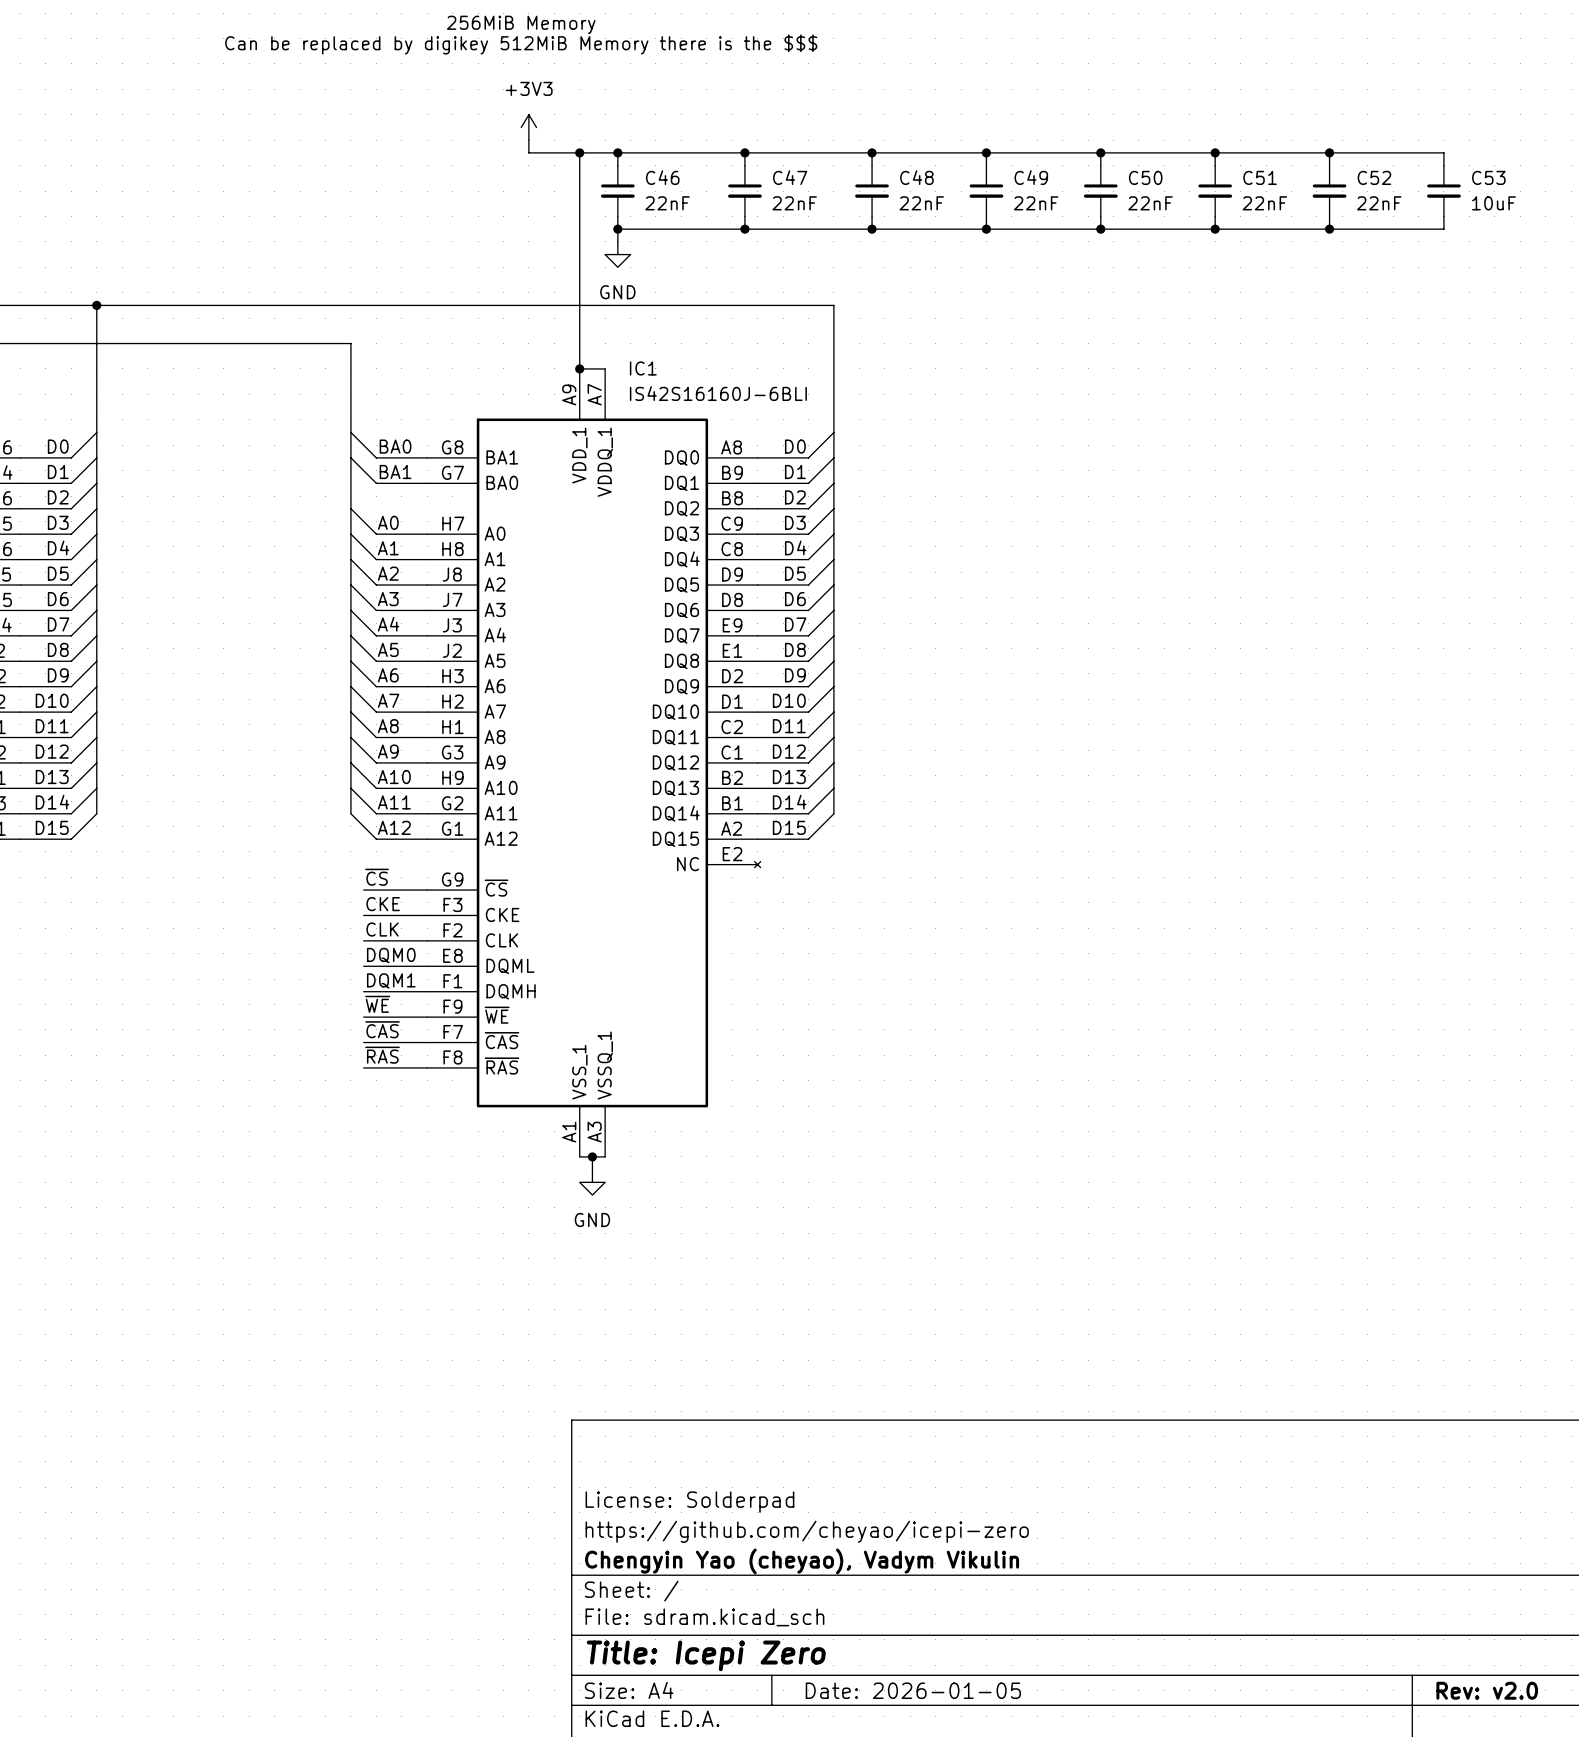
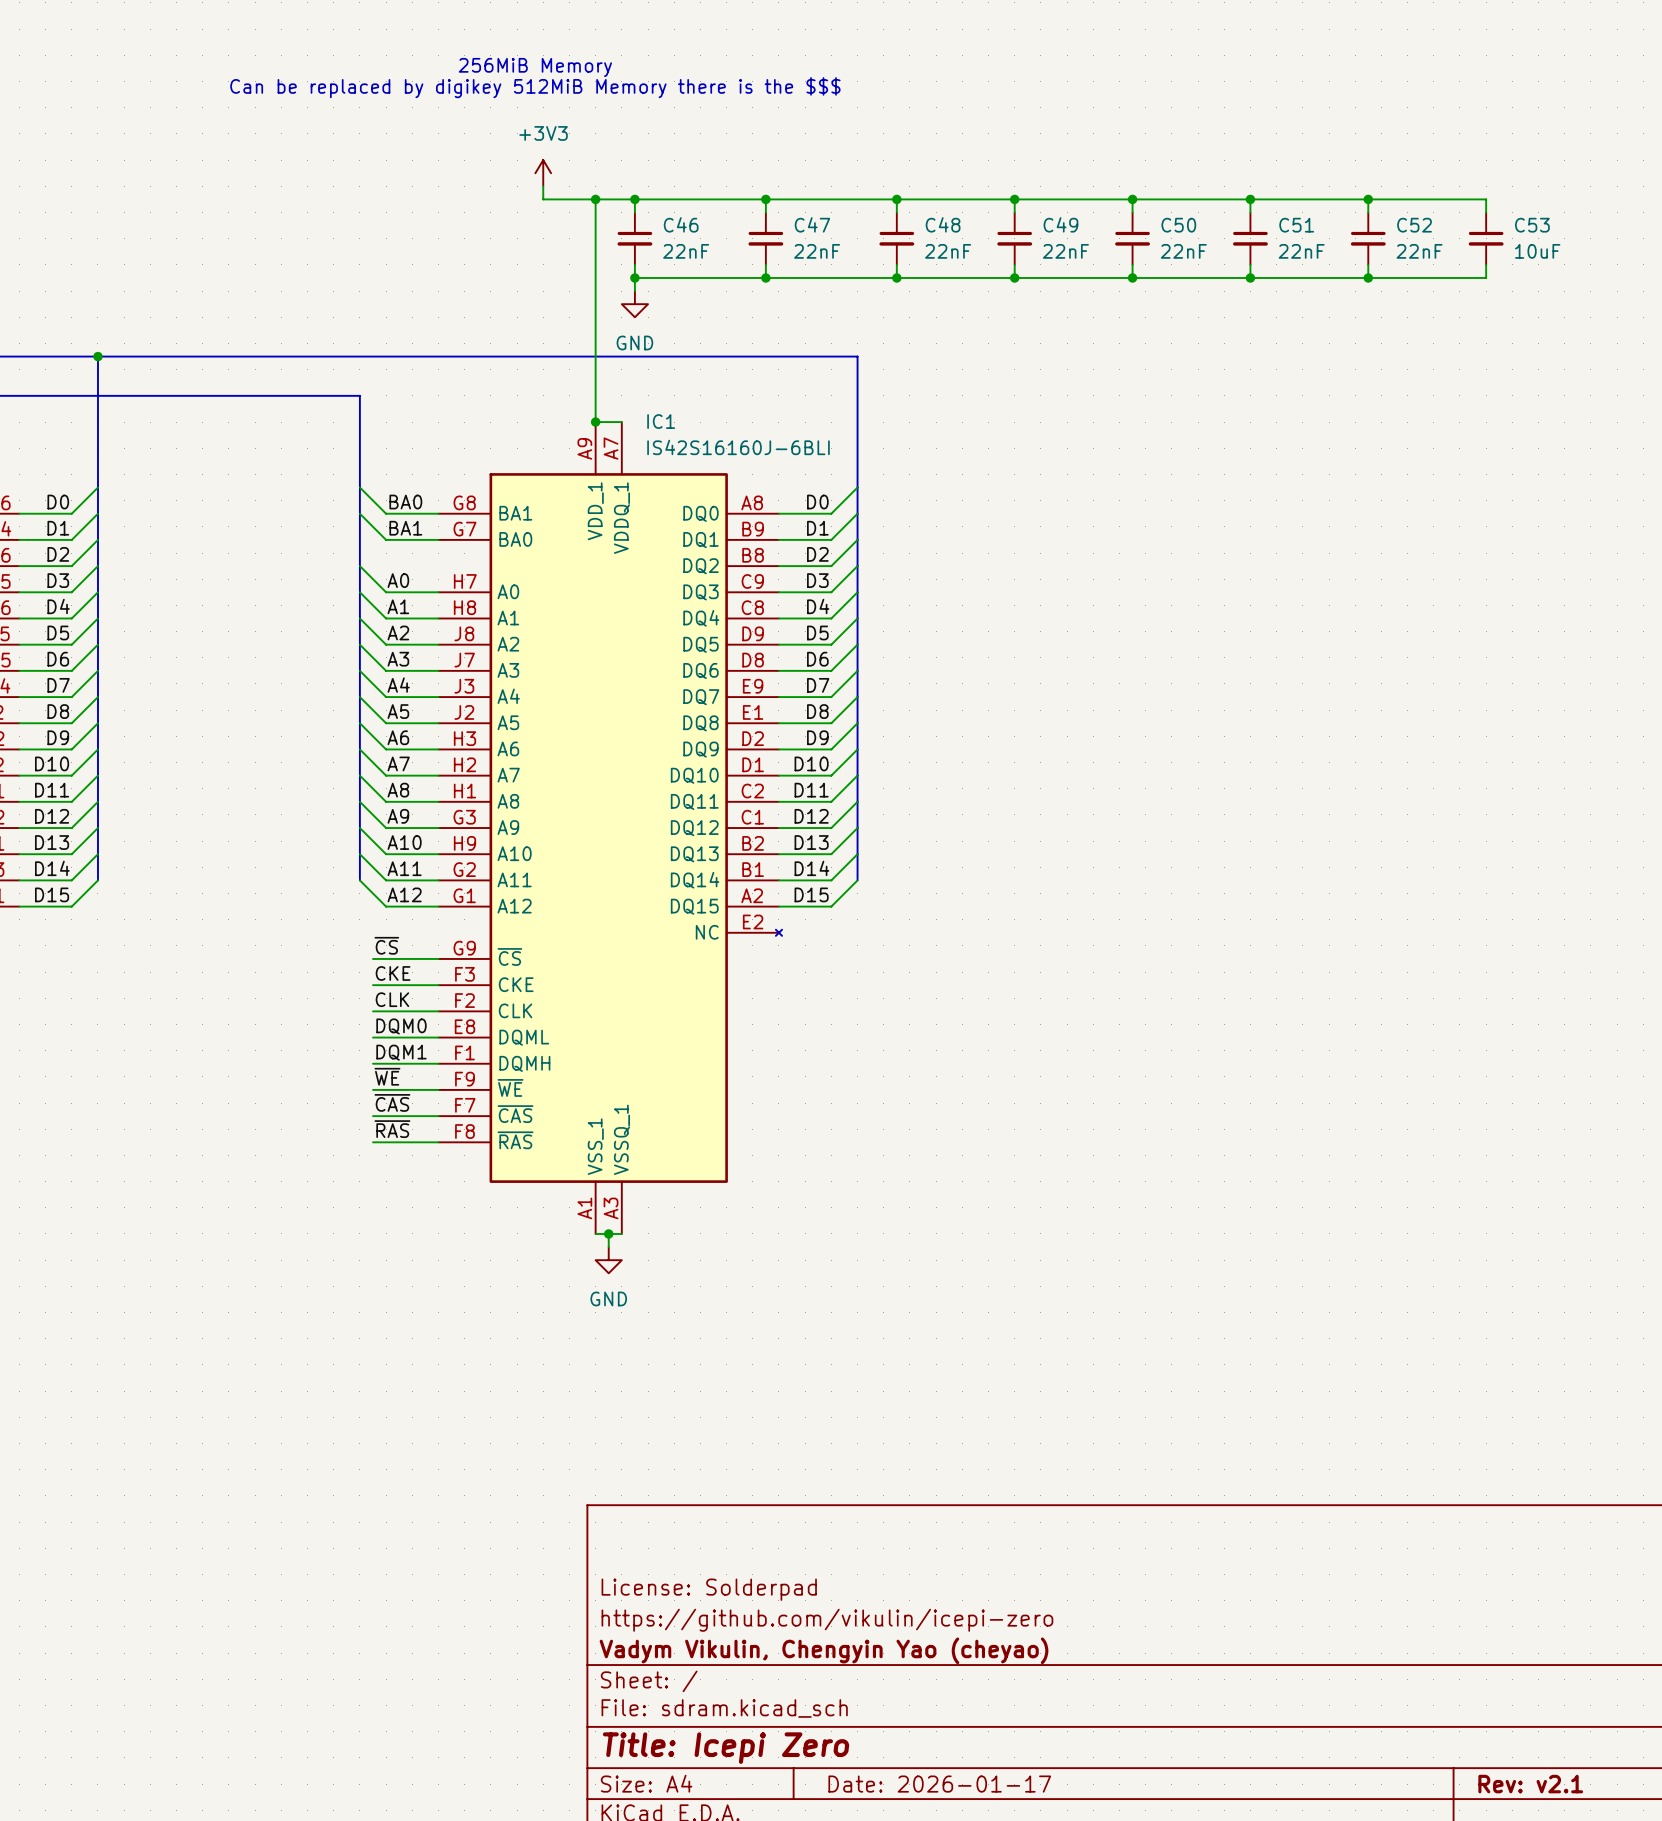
title block: https://github.com/cheyao/icepi-zero (807, 1531) -> https://github.com/vikulin/icepi-zero (827, 1620)
title block: Chengyin Yao (cheyao), Vadym Vikulin (802, 1561) -> Vadym Vikulin, Chengyin Yao (cheyao) (824, 1650)
title block: Date: 2026-01-05 (913, 1690) -> Date: 2026-01-17 (939, 1784)
title block: Rev: v2.0 (1487, 1690) -> Rev: v2.1 (1530, 1784)

